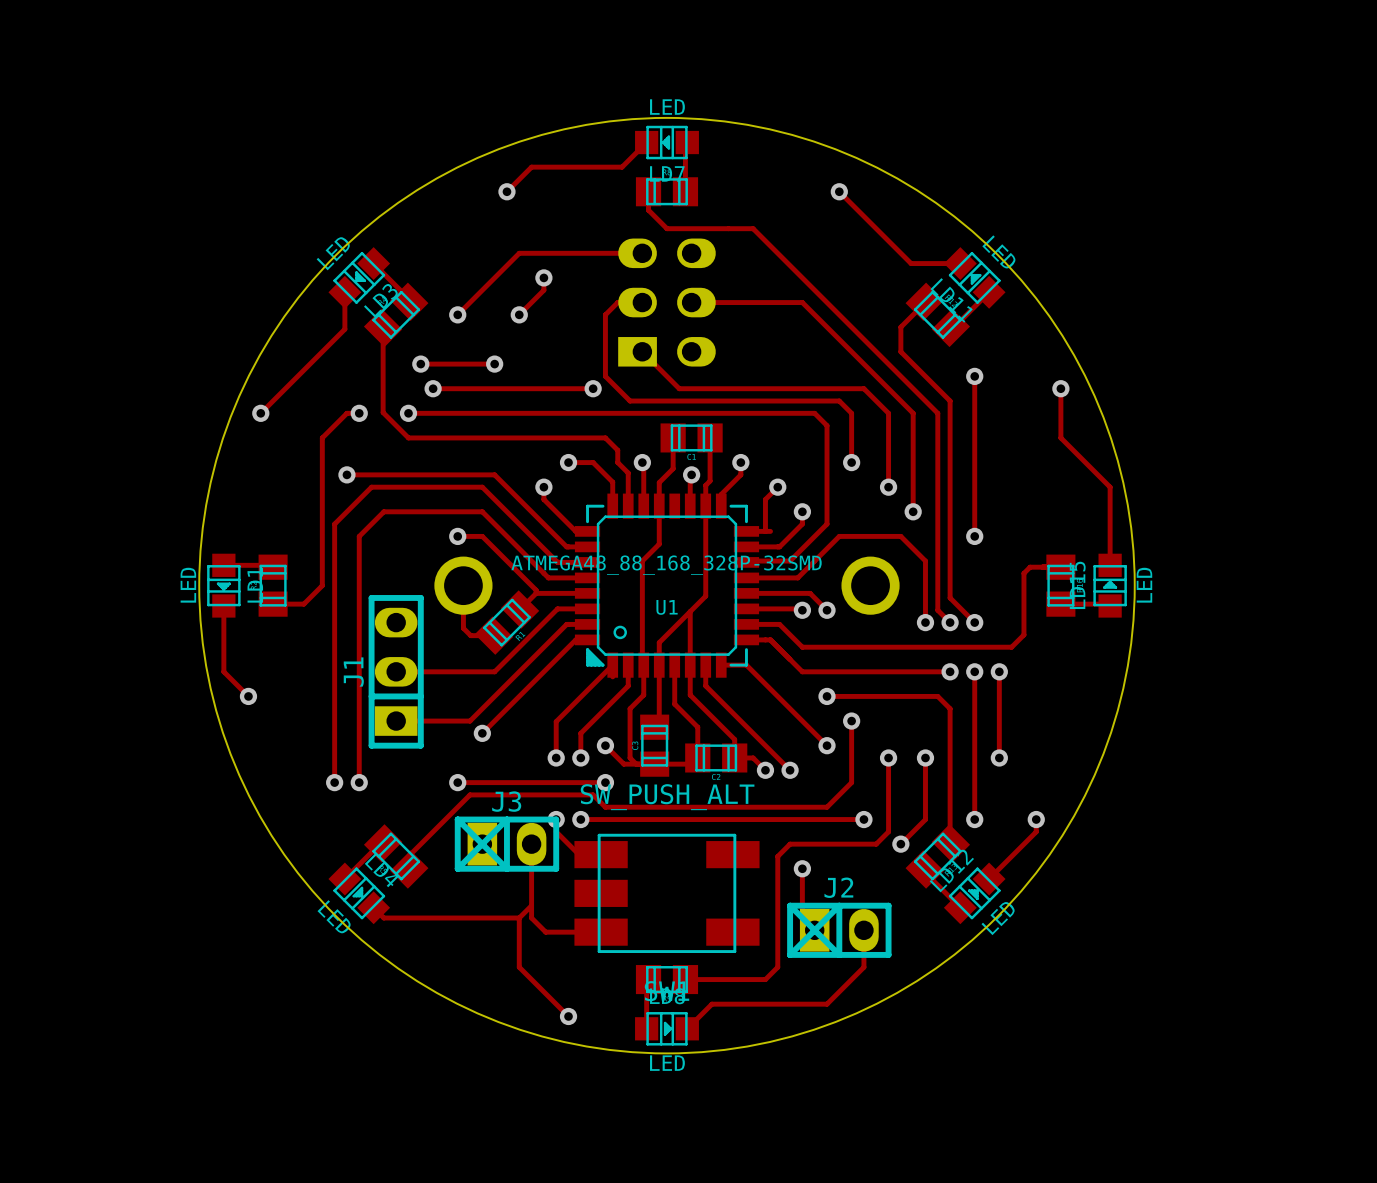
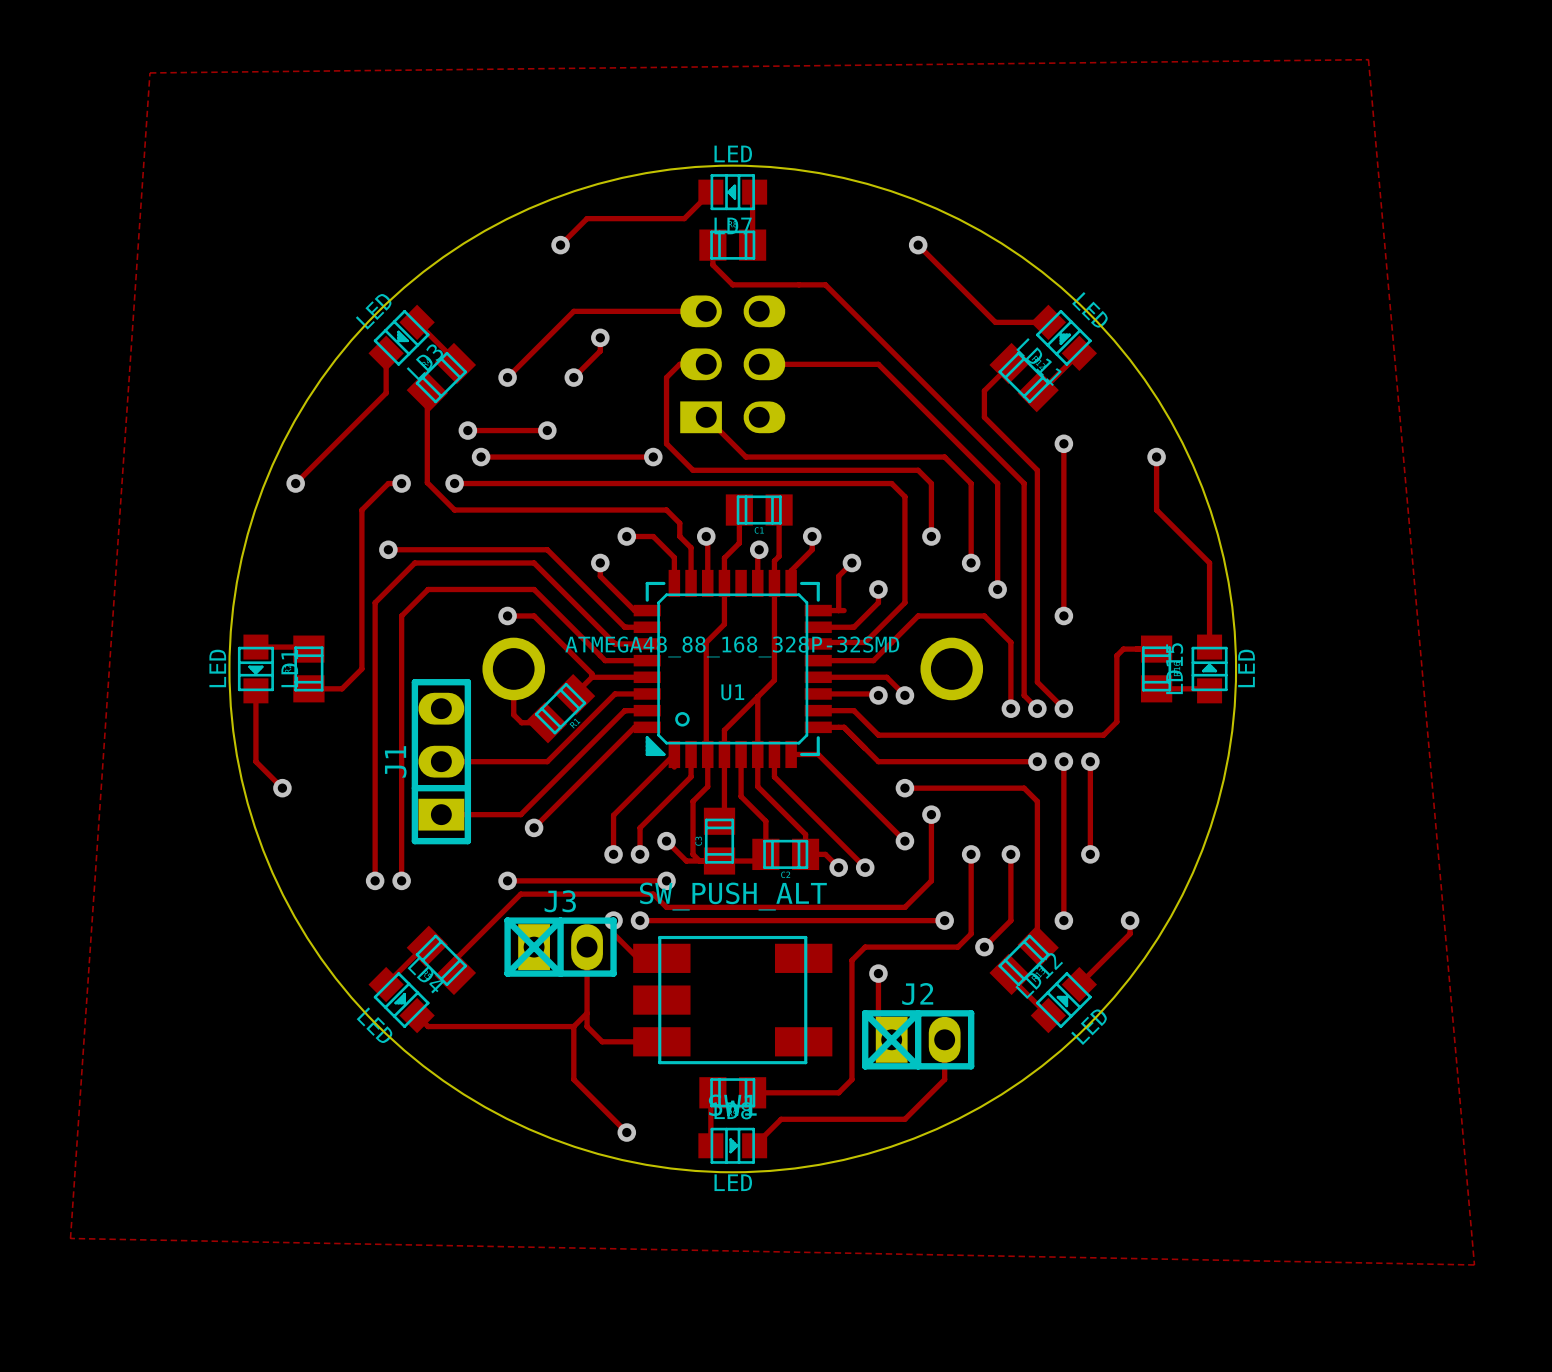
zone outline: none -> (1368, 59) (149, 72) (70, 1238) (1474, 1264) (1368, 59)

